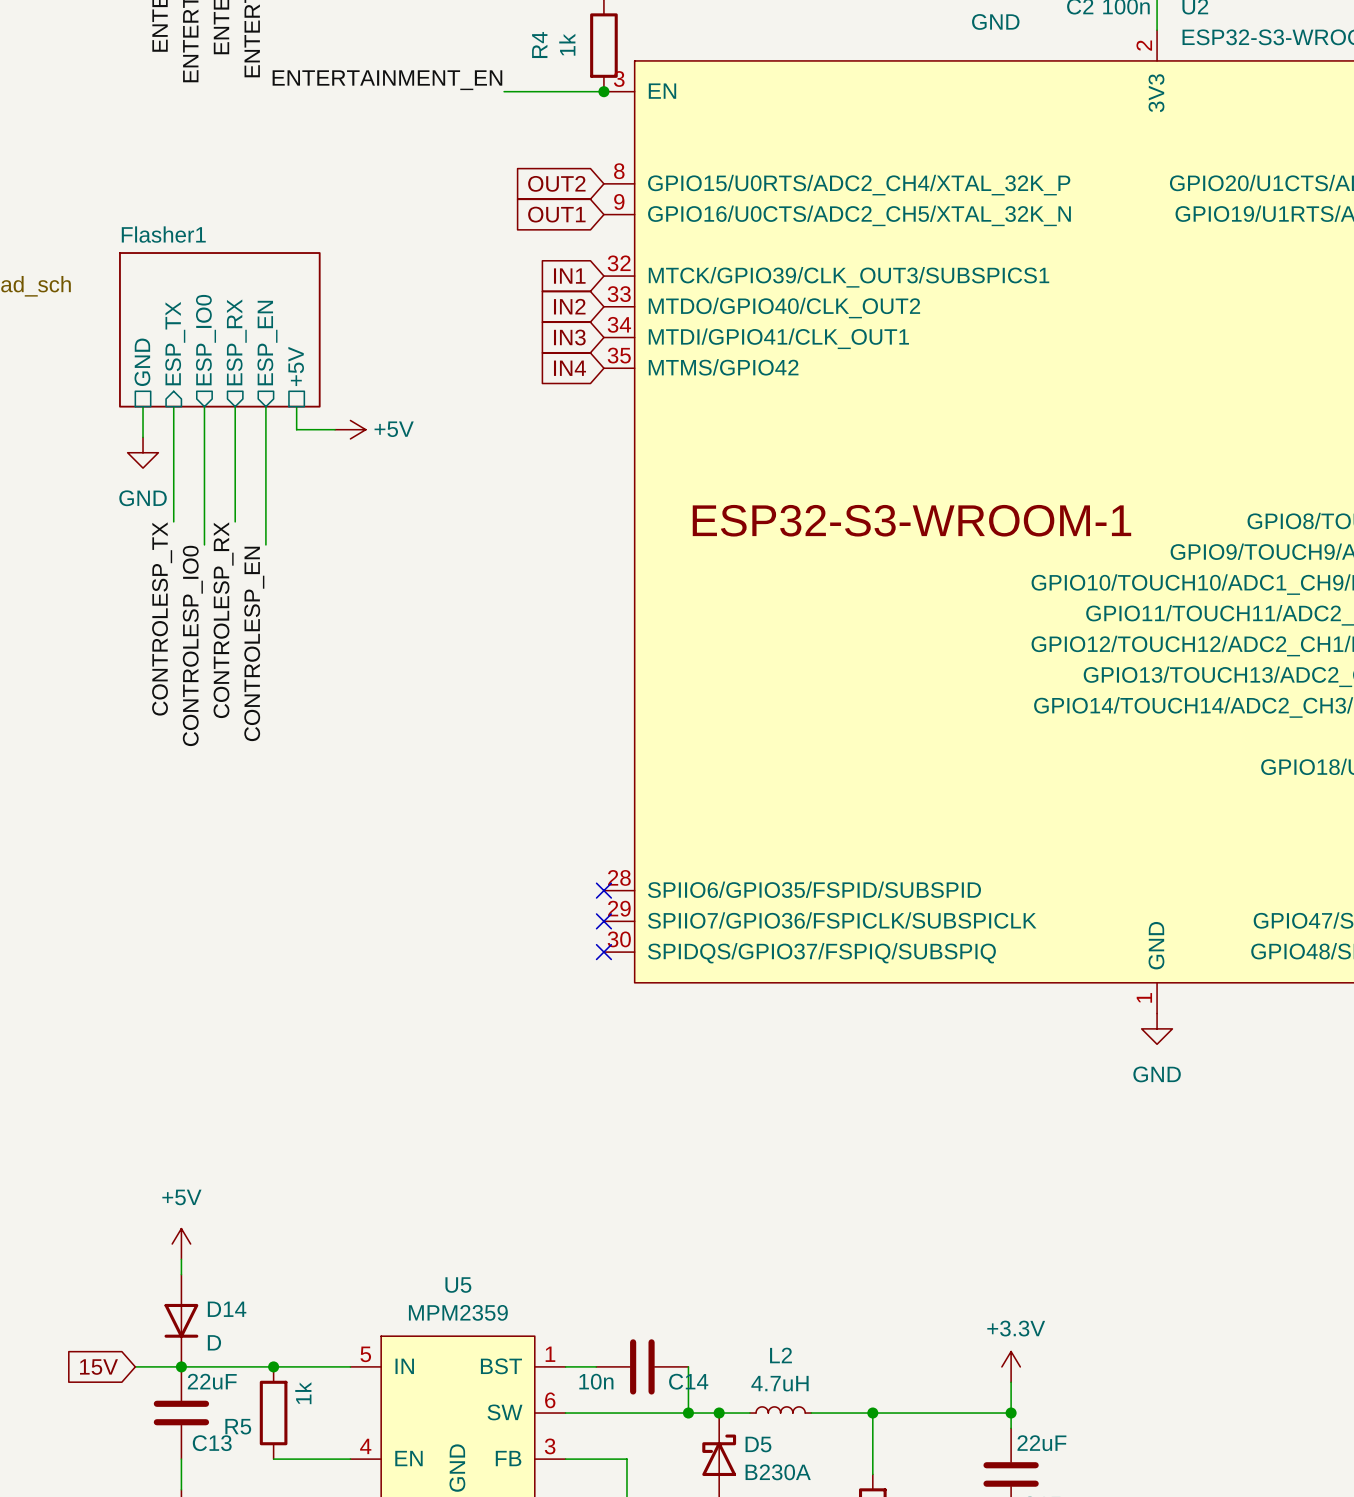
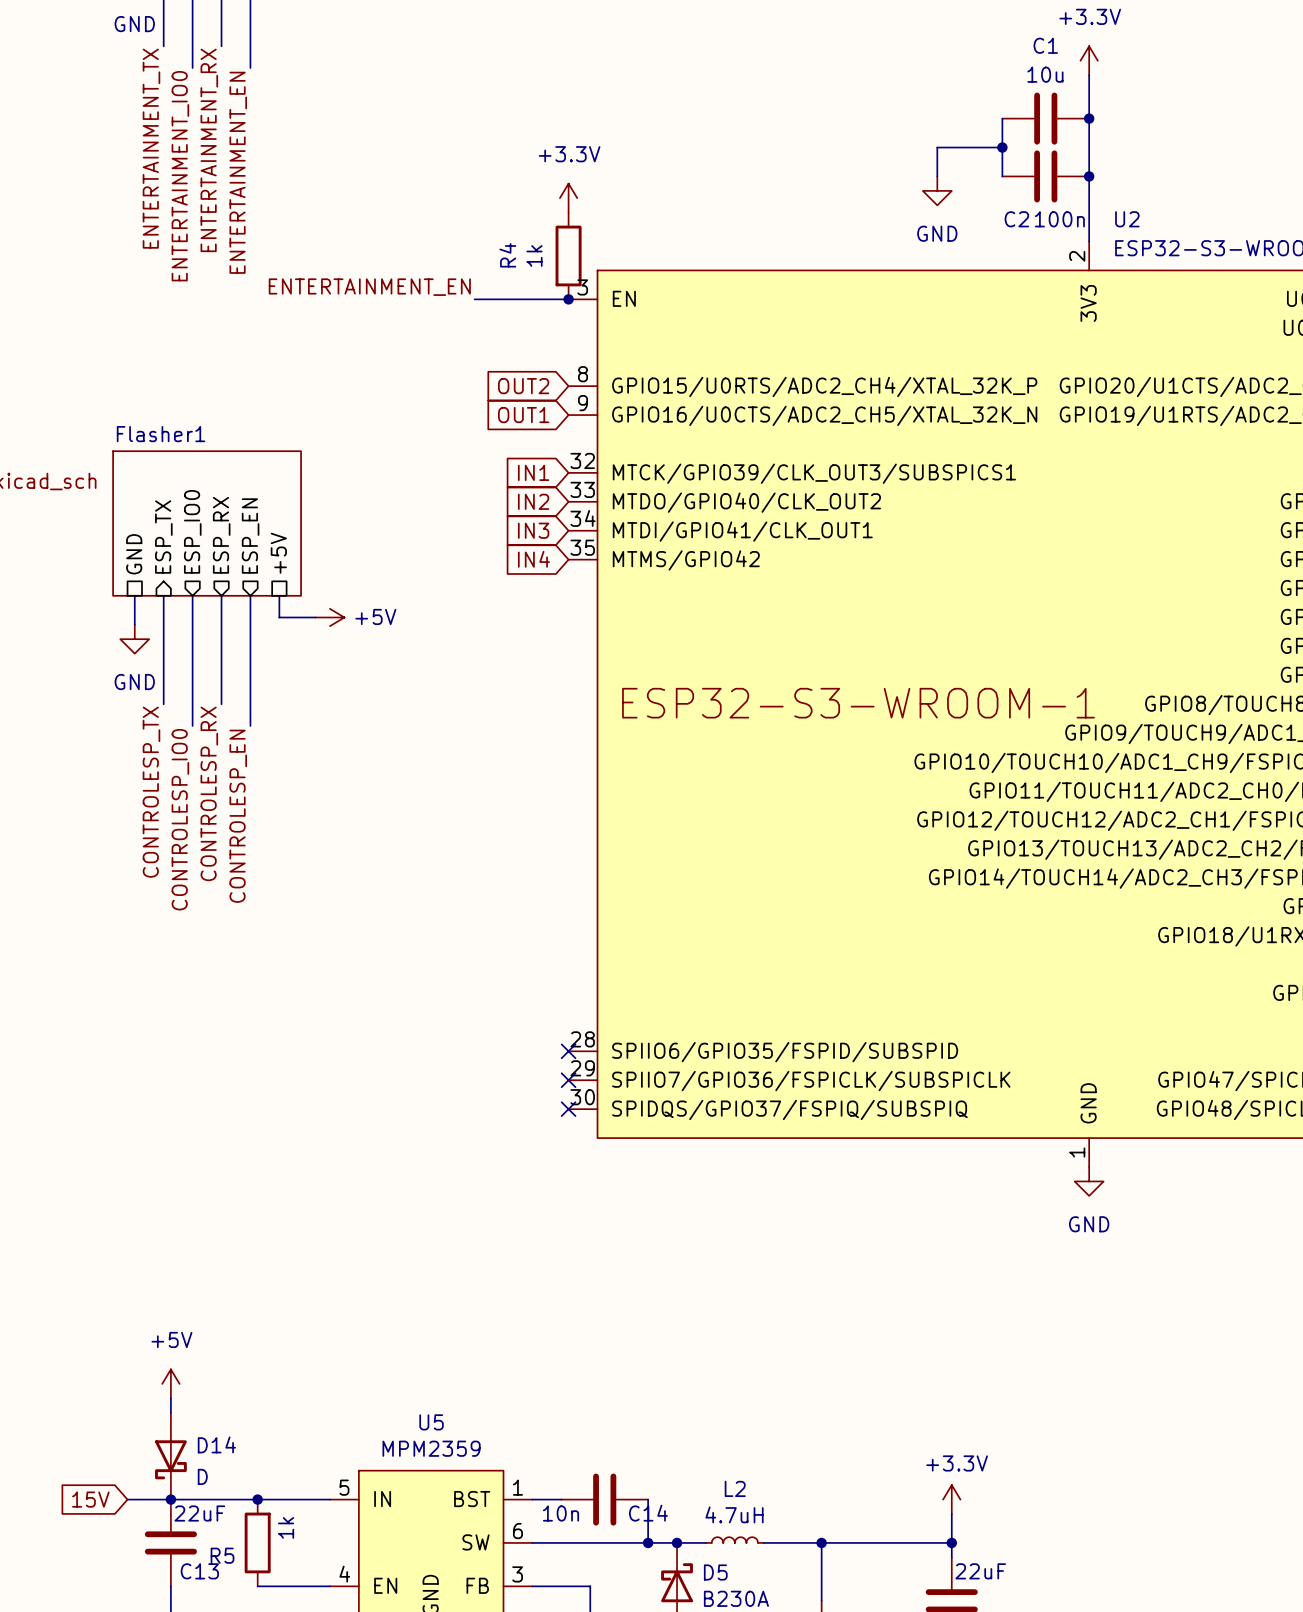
D14 symbol: [164, 1274, 199, 1367] -> [155, 1412, 187, 1500]

